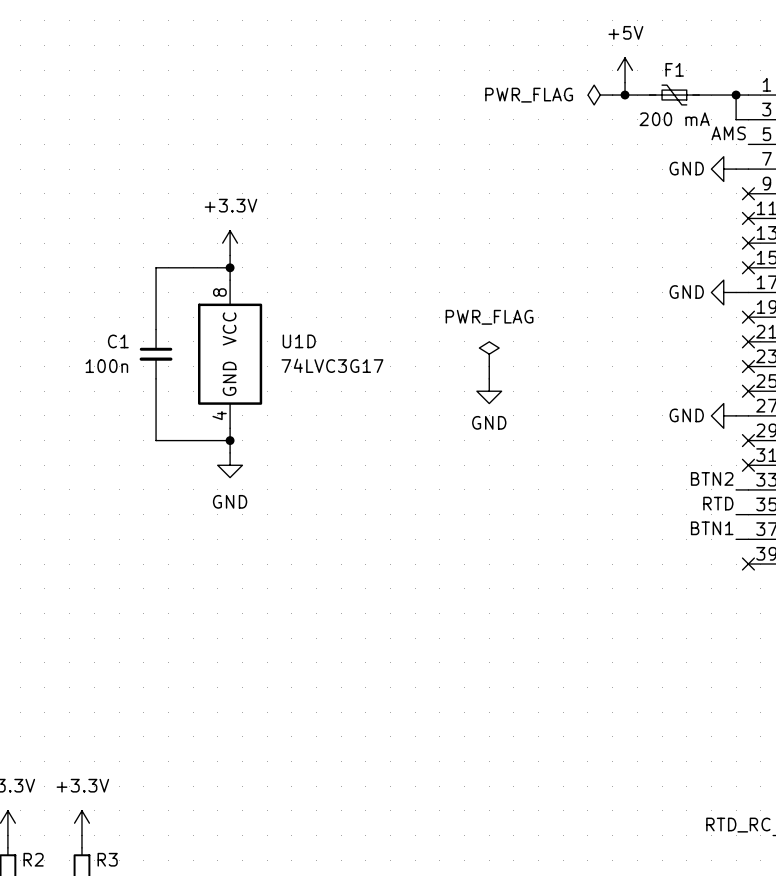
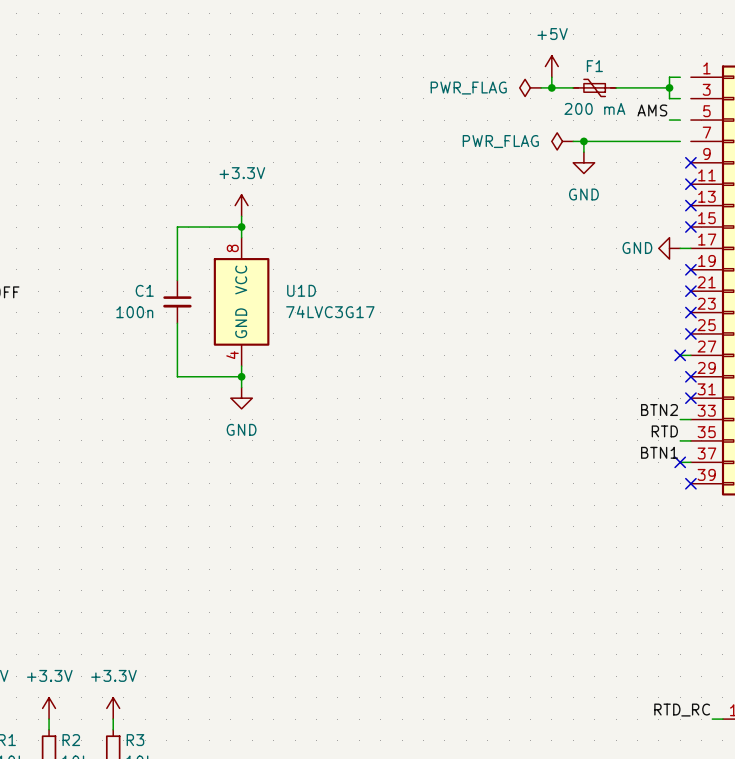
power symbol position: +5V (625, 70) -> +5V (551, 66)
wire: (625, 82) (625, 95) -> (551, 77) (551, 87)
power symbol: PWR_FLAG (600, 95) -> none
wire: (612, 95) (649, 95) -> (541, 87) (573, 87)
junction: (625, 95) -> none
F1 position: (674, 95) -> (594, 87)
wire: (699, 95) (723, 95) -> (680, 98) (669, 98) (669, 77)
junction position: (736, 95) -> (669, 87)
wire: (748, 95) (736, 95) (736, 119) (748, 119) -> none
power symbol: none -> PWR_FLAG (530, 87)
junction: none -> (551, 87)
wire: none -> (616, 87) (669, 87)
label position: AMS (728, 133) -> AMS (652, 110)
wire: none -> (669, 120) (680, 120)
power symbol: none -> PWR_FLAG (562, 141)
junction: none -> (583, 141)
power symbol: GND (723, 169) -> none
wire: (736, 169) (748, 169) -> (680, 141) (573, 141)
power symbol: none -> GND (583, 162)
power symbol: PWR_FLAG (489, 354) -> none
wire: (489, 366) (489, 378) -> (583, 141) (583, 152)
power symbol: GND (489, 391) -> none
power symbol: GND (723, 415) -> none
no-connect mark: none -> (680, 355)
no-connect mark: none -> (680, 462)

